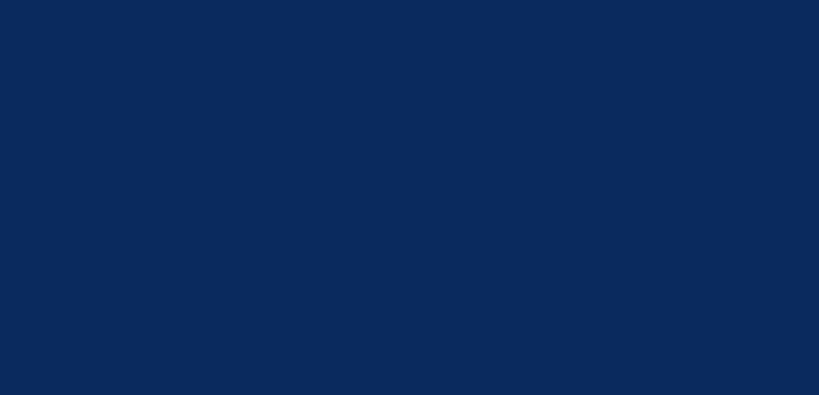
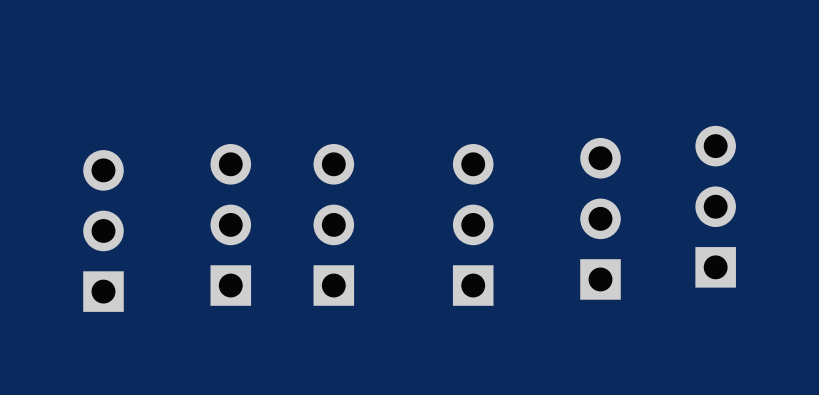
part: none -> (715, 206)
part: none -> (600, 218)
part: none -> (230, 224)
part: none -> (333, 224)
part: none -> (473, 224)
part: none -> (103, 230)

